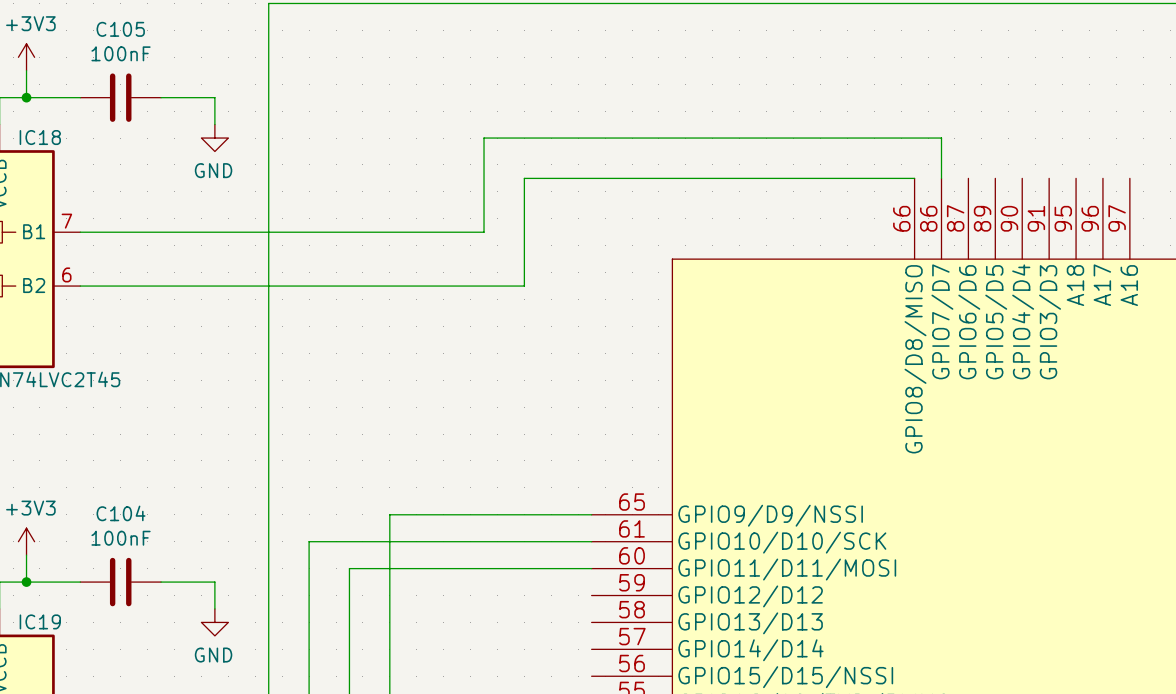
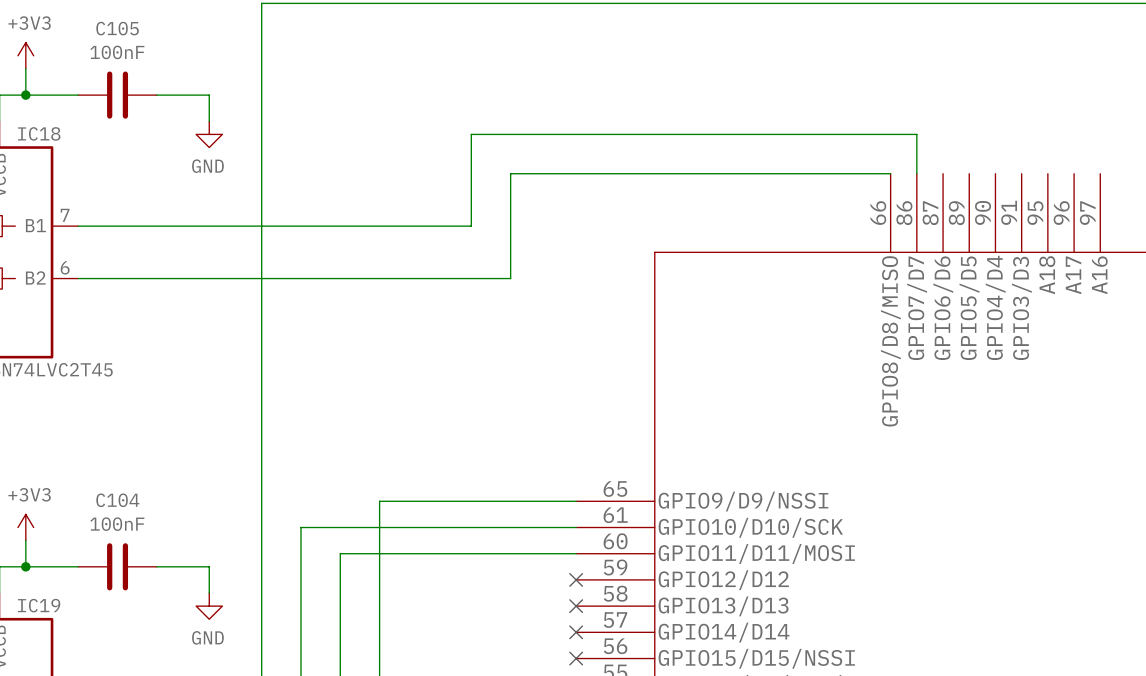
no-connect mark: none -> (576, 579)
no-connect mark: none -> (576, 606)
no-connect mark: none -> (576, 632)
no-connect mark: none -> (576, 658)

